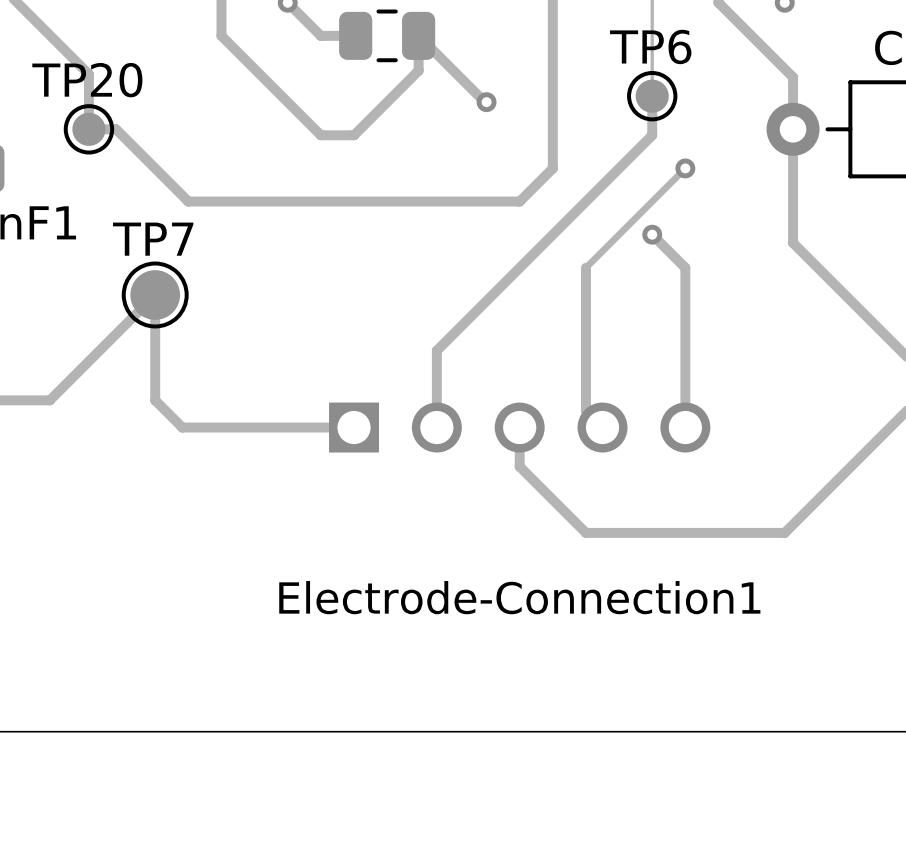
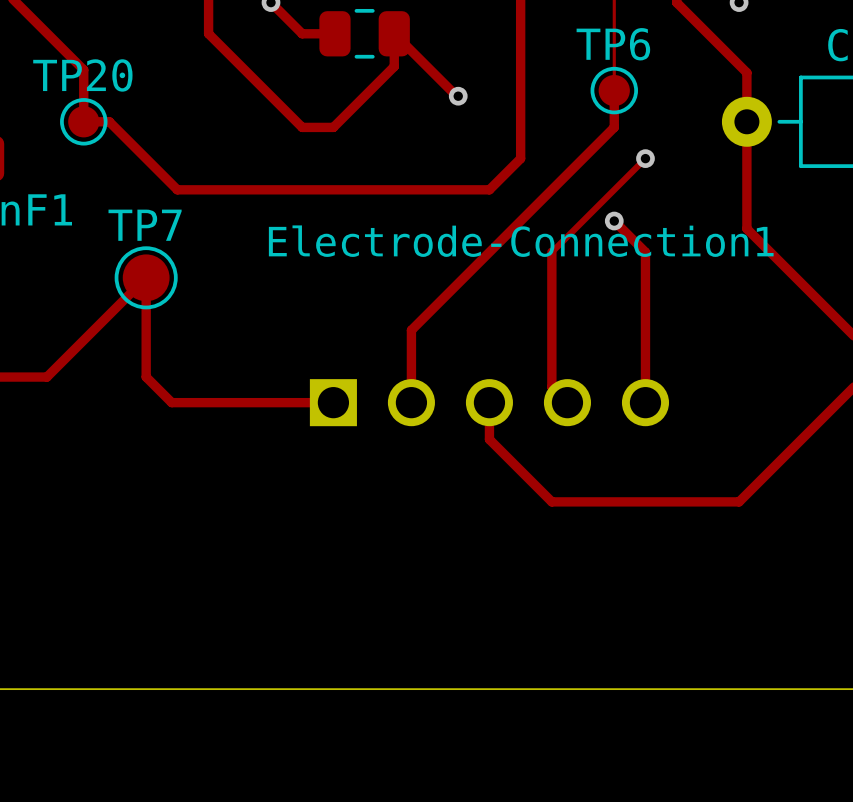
Electrode-Connection1 name position: Electrode-Connection1 (519, 597) -> Electrode-Connection1 (521, 241)

